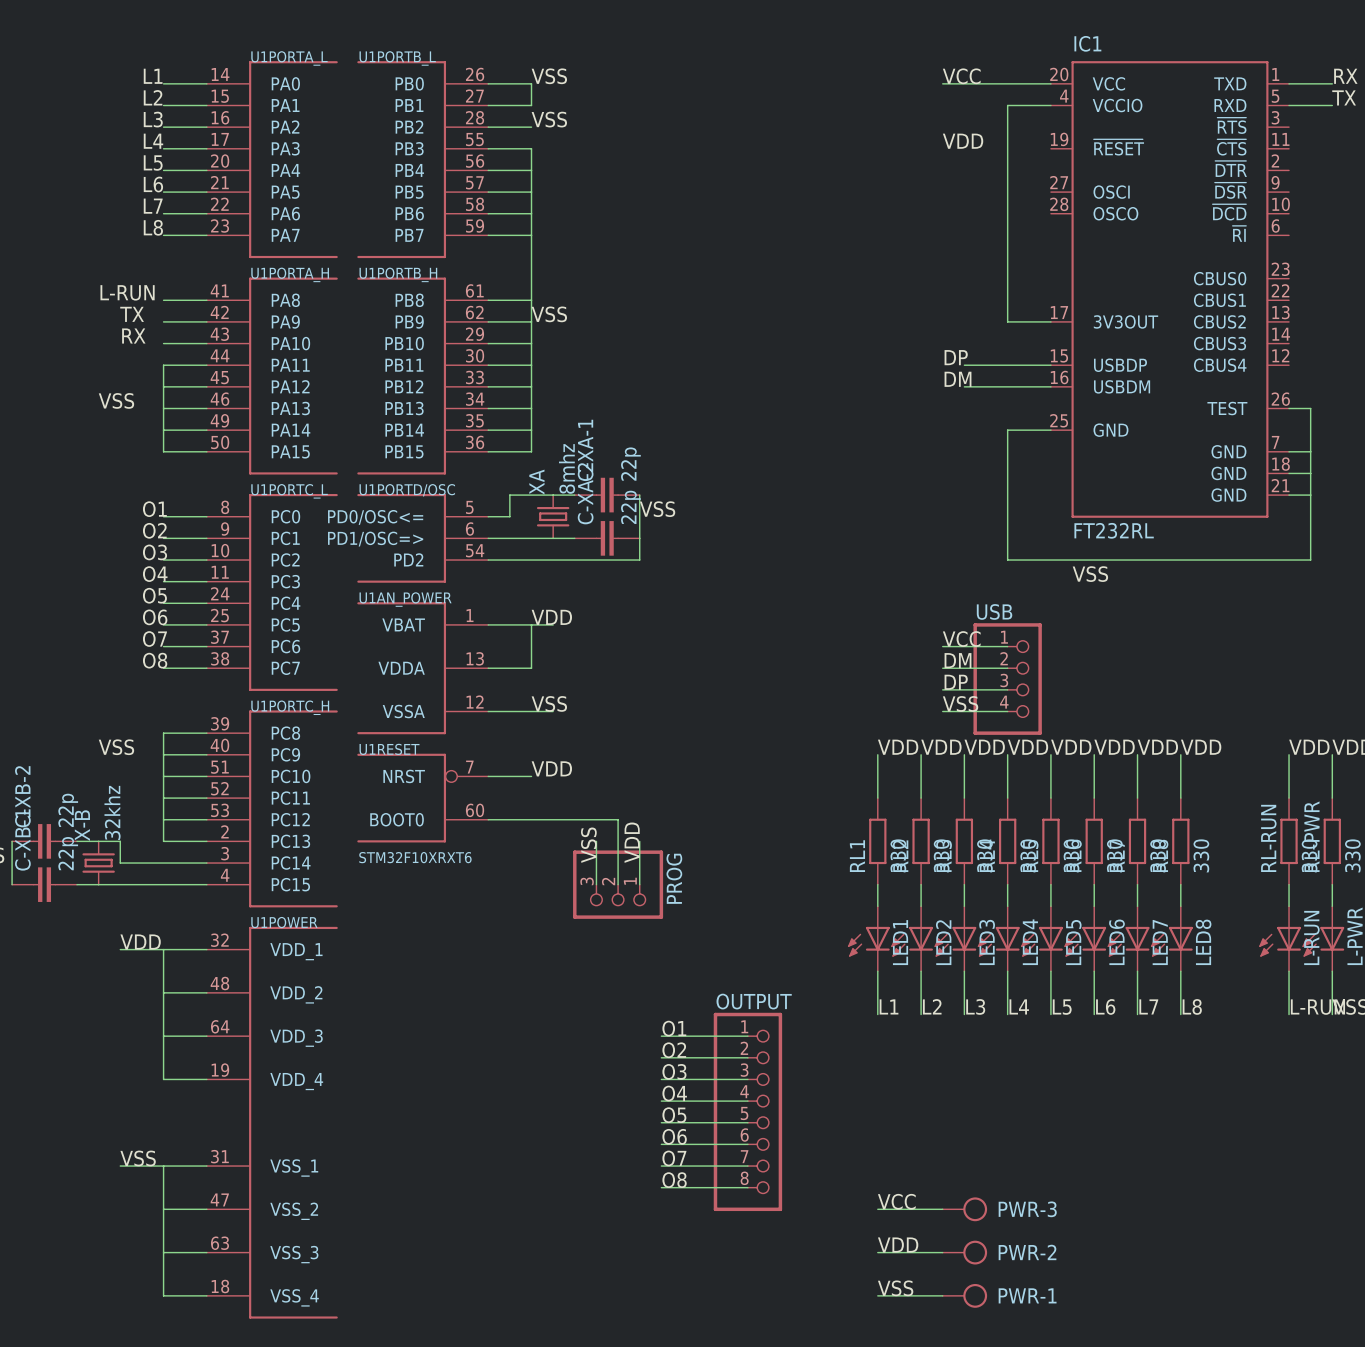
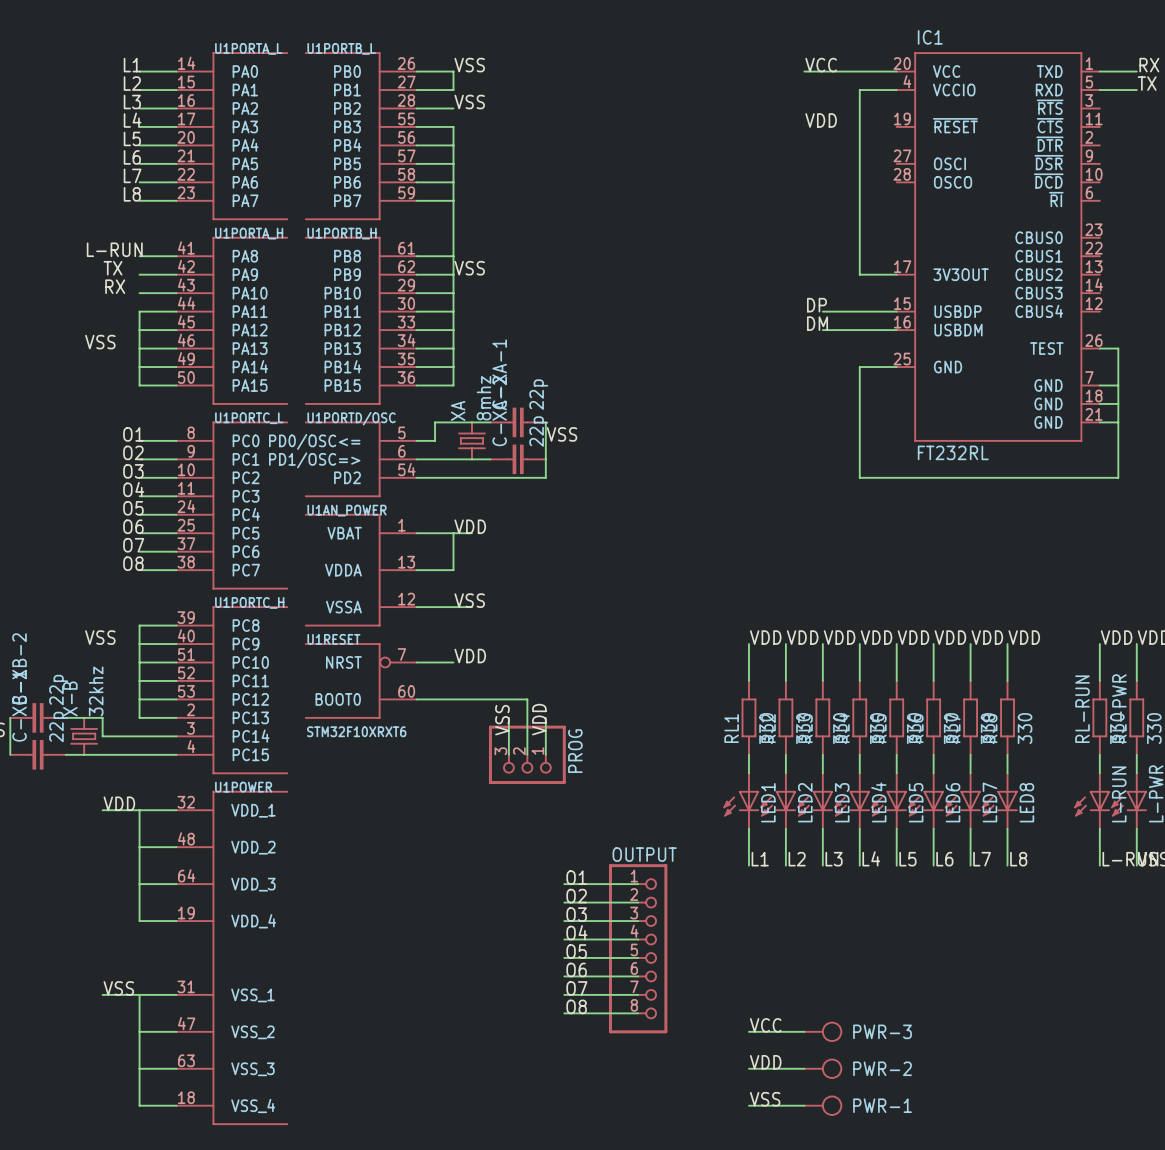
label: VSS (1090, 574) -> none
label: VCC (961, 639) -> none
wire: (942, 646) (1007, 646) -> none
label: DM (958, 660) -> none
wire: (942, 668) (1007, 668) -> none
USB: (1007, 679) -> none
label: DP (956, 682) -> none
wire: (942, 689) (1007, 689) -> none
label: VSS (960, 703) -> none
wire: (942, 711) (1007, 711) -> none

